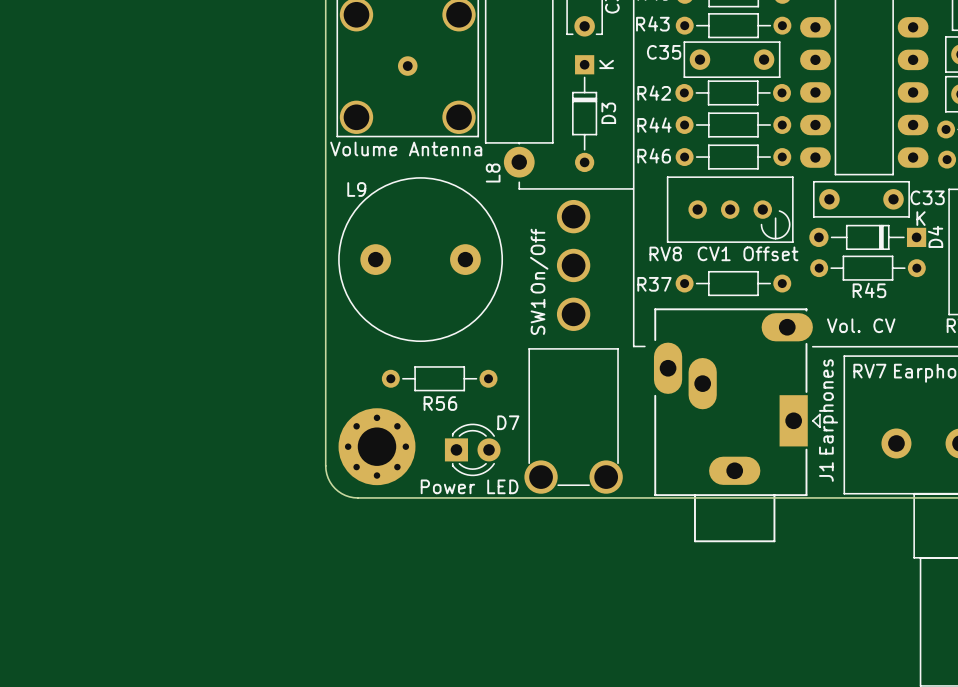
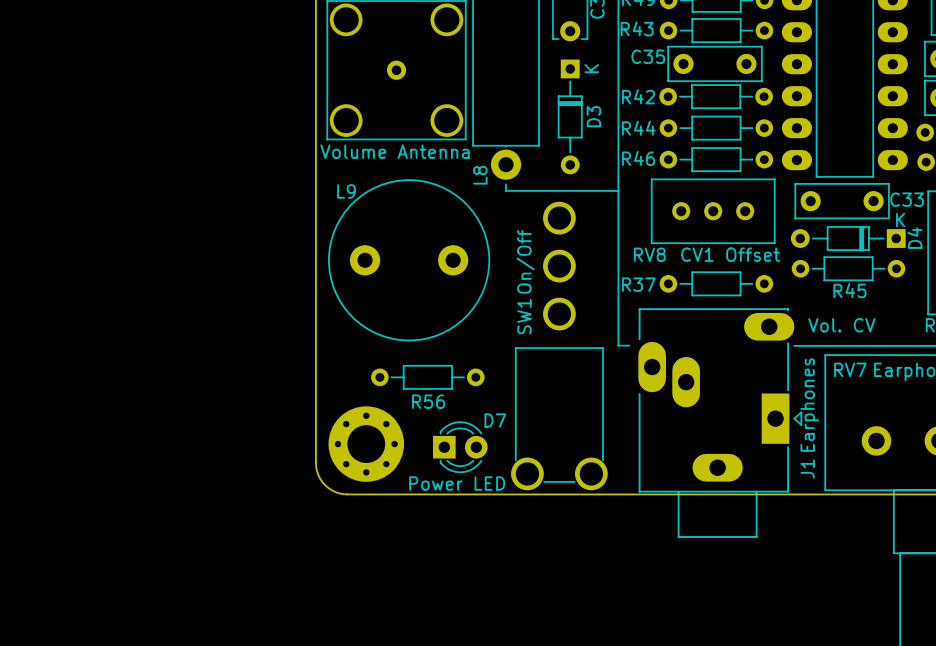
line: (779, 211) (785, 214) (789, 222) (788, 230) (784, 235) (777, 238) (770, 237) (763, 231) (761, 224) -> none
line: (775, 218) (775, 238) -> none

